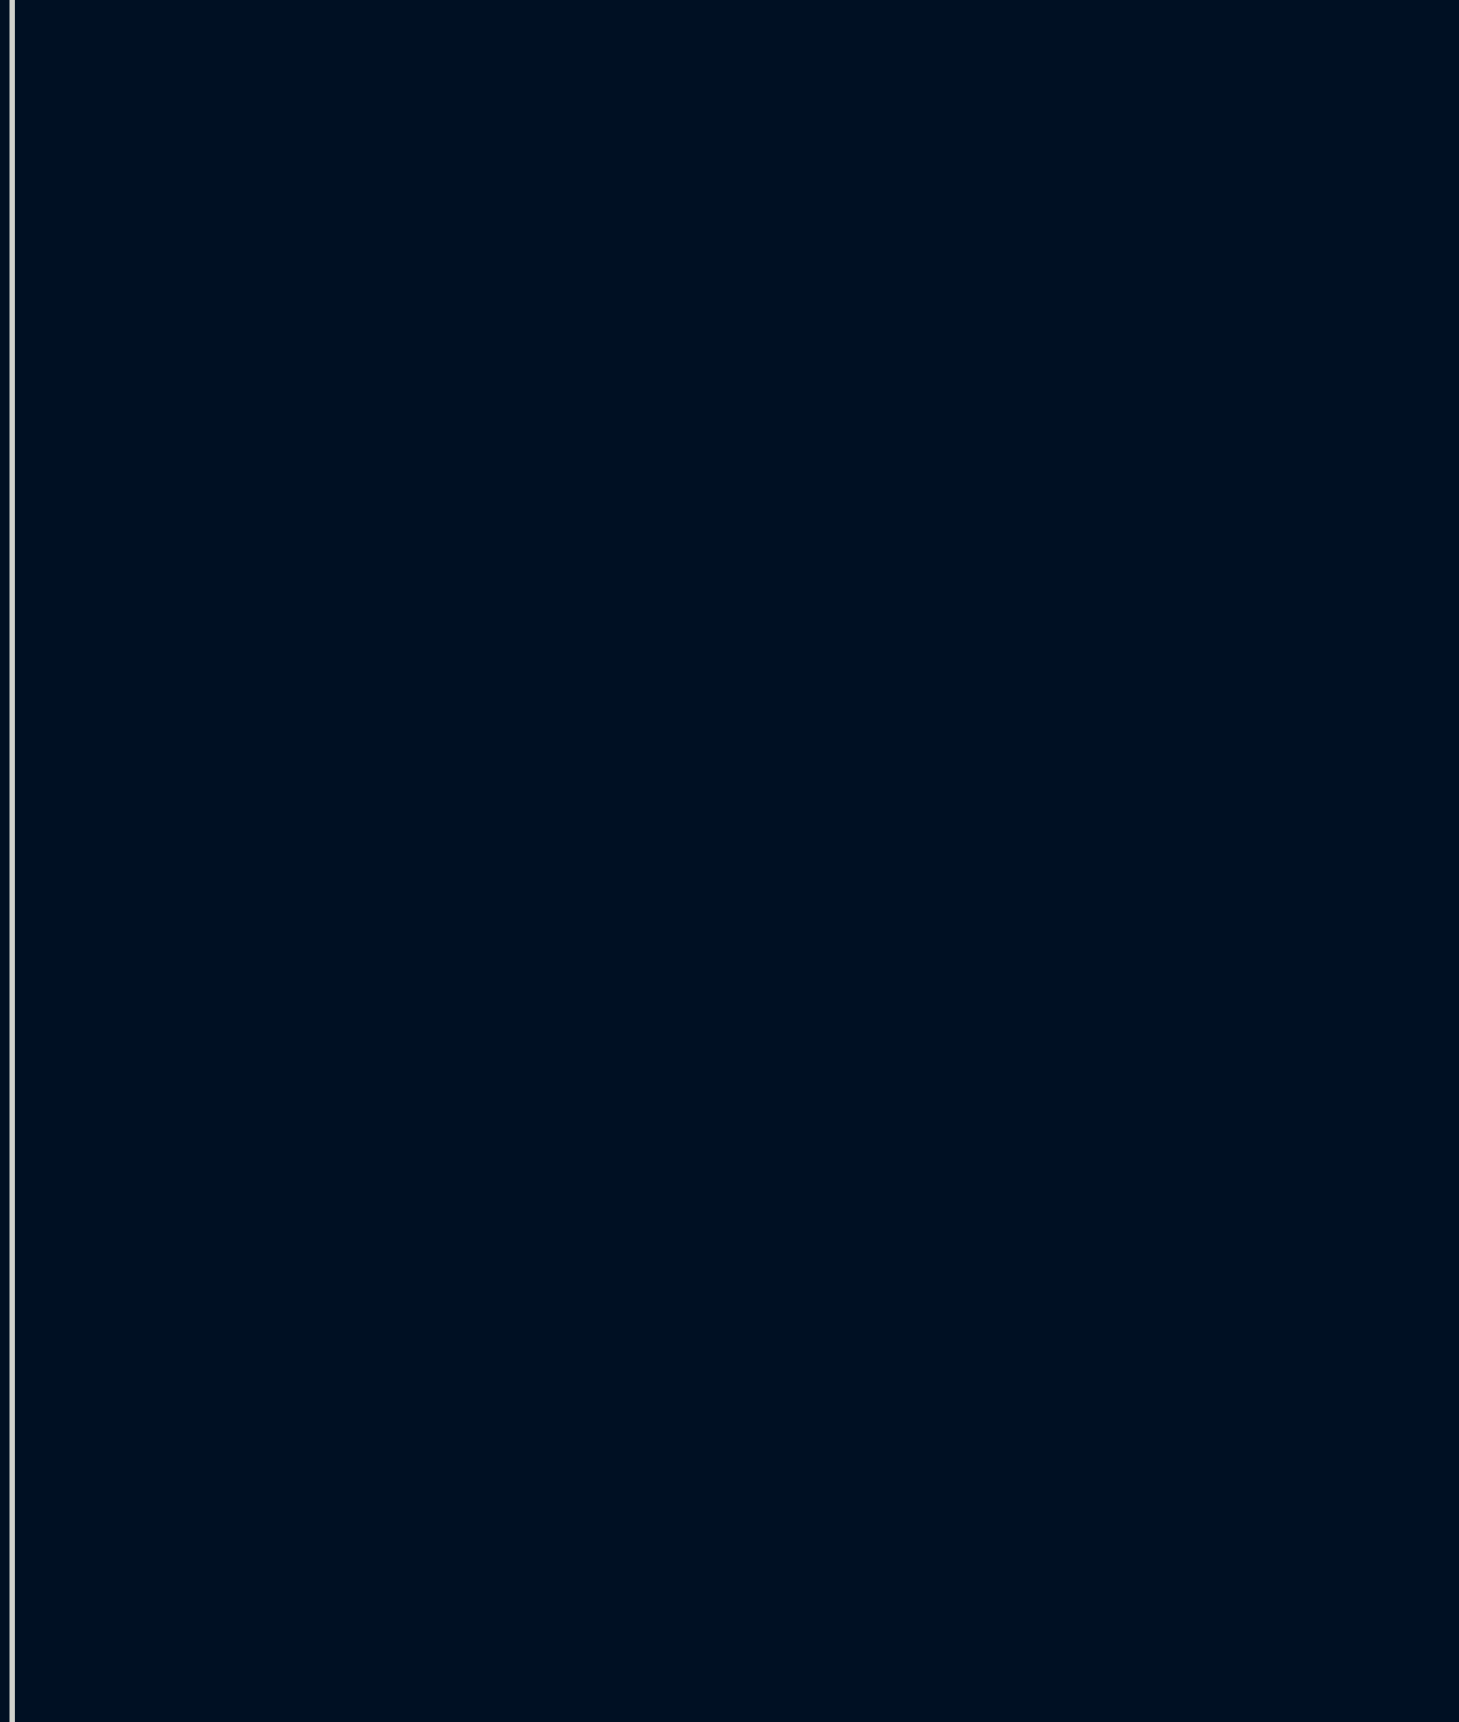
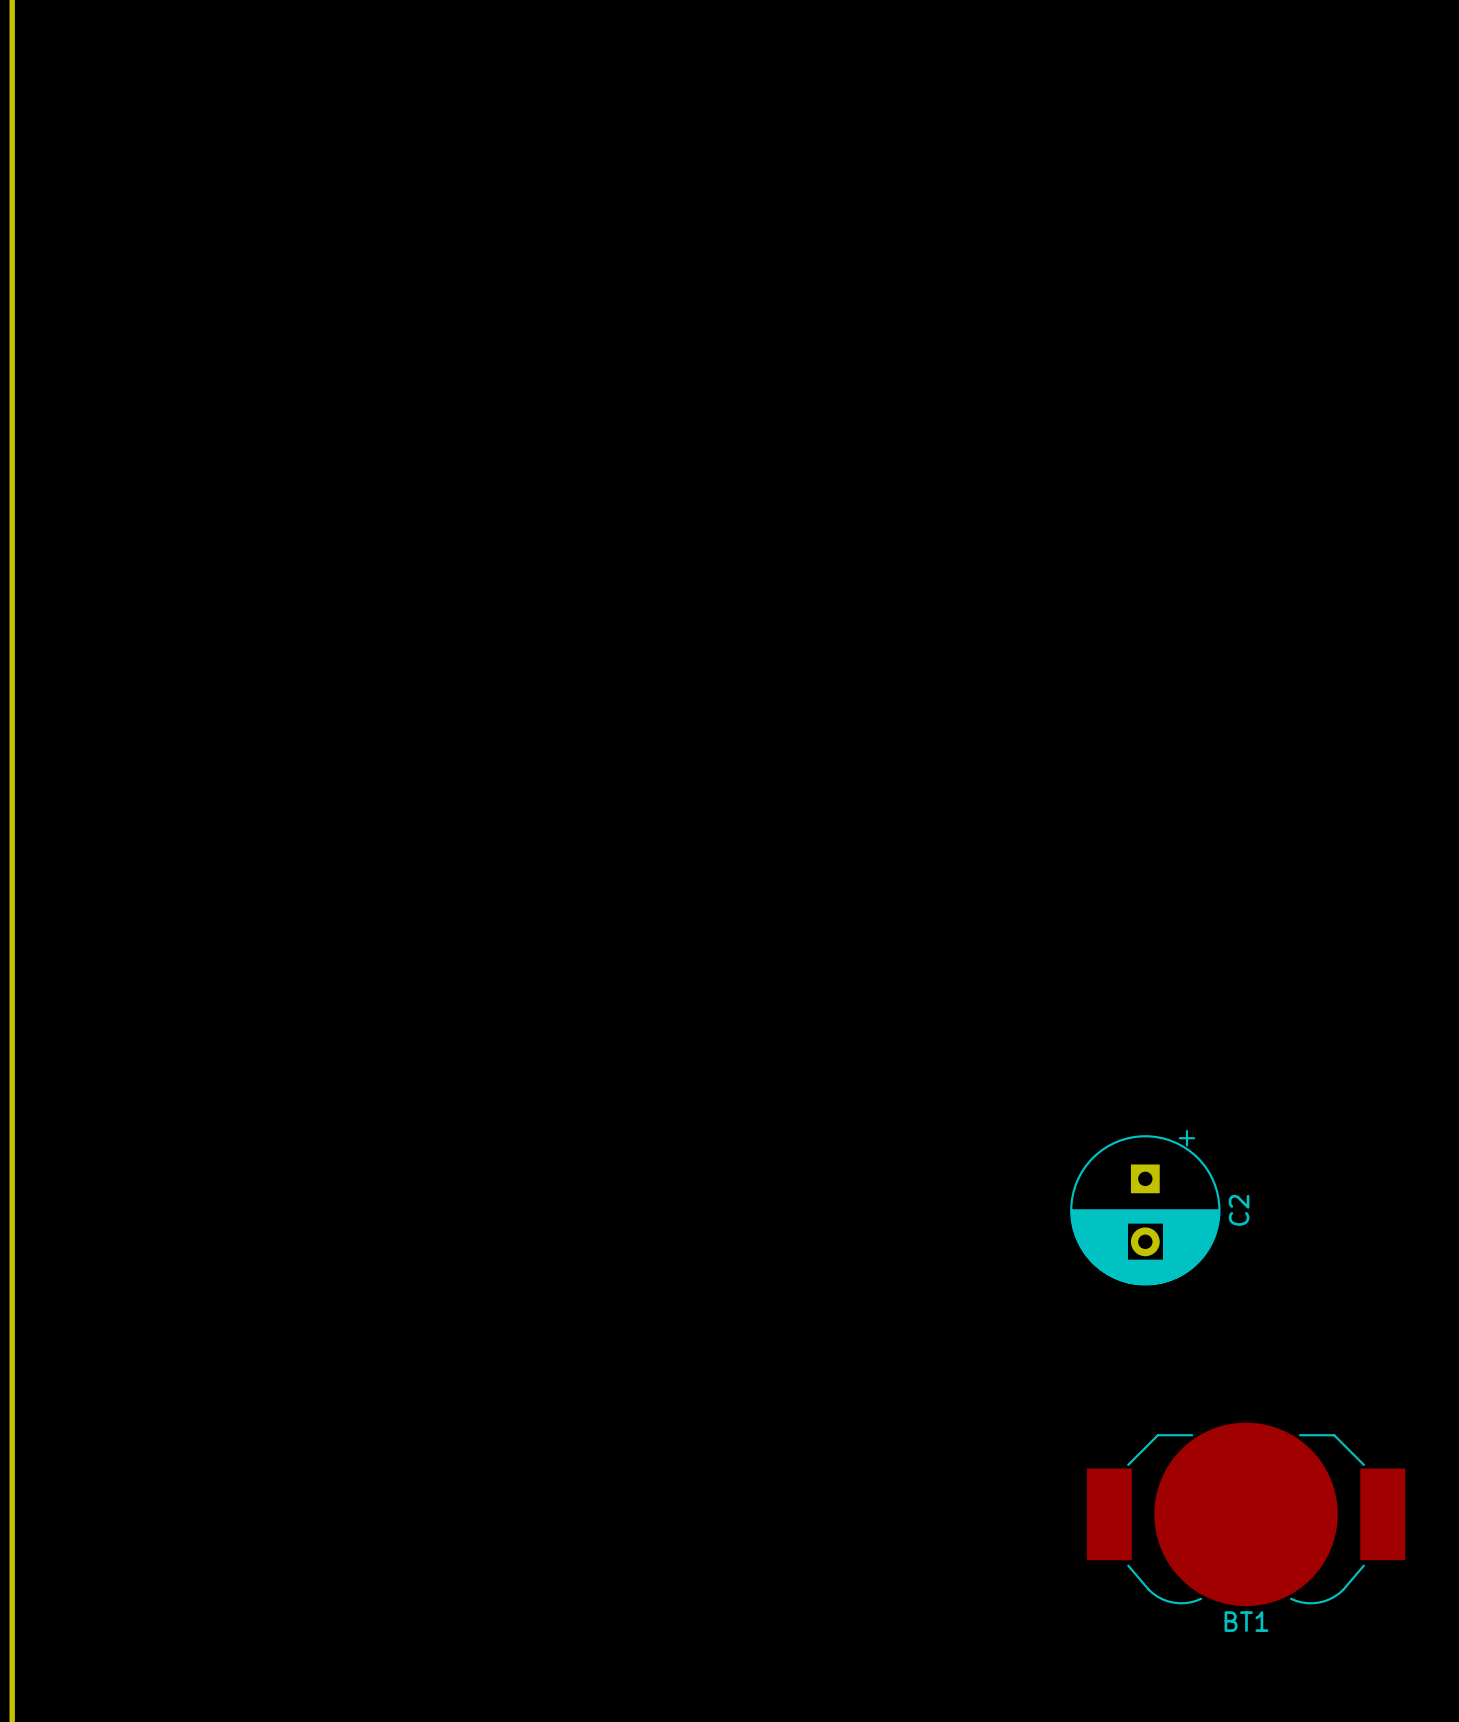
C2: none -> (1145, 1207)
BT1: none -> (1246, 1514)

